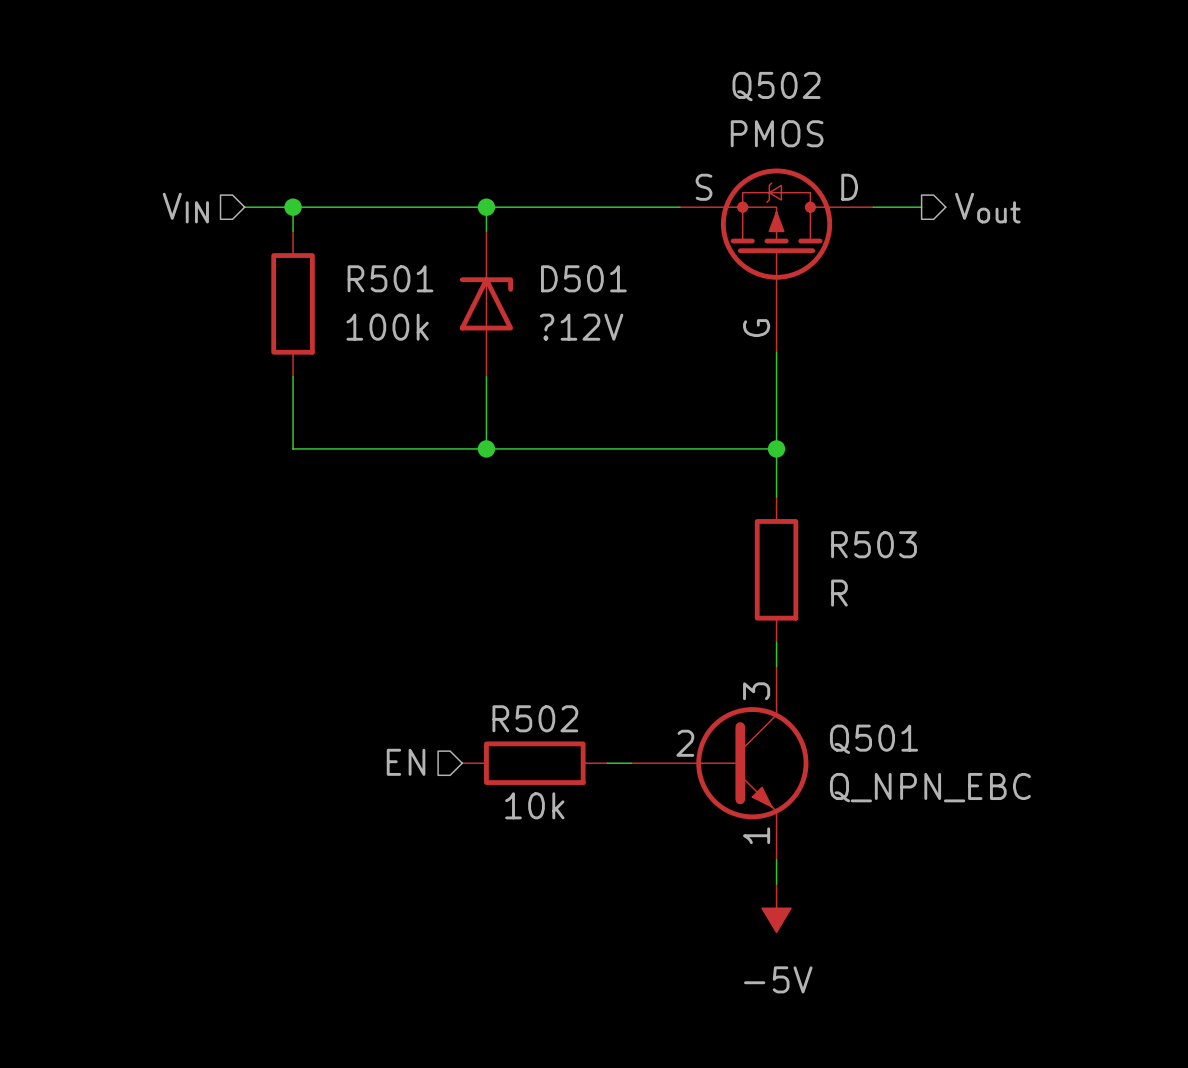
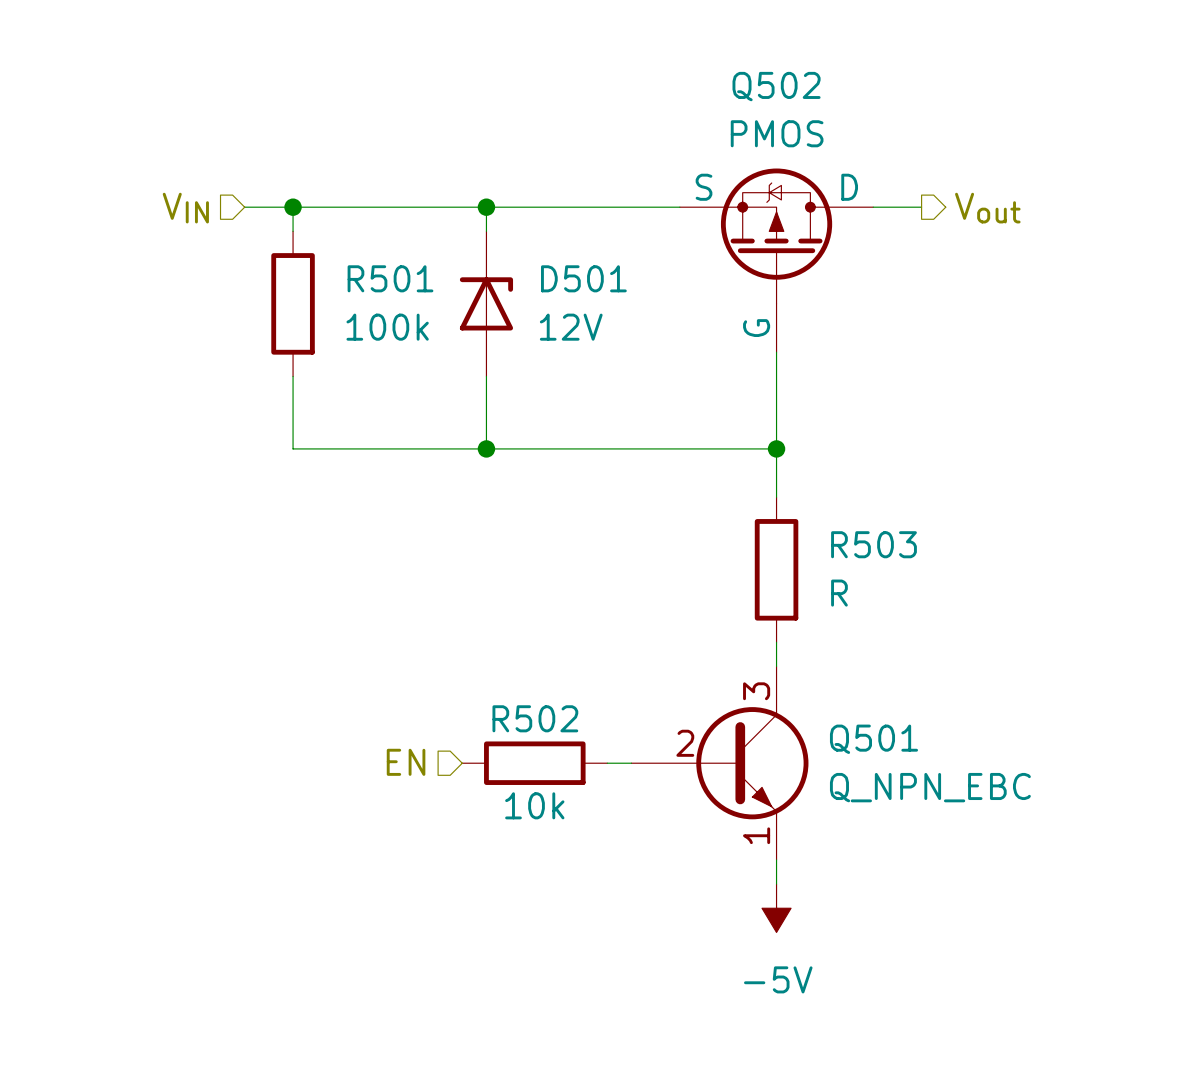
D501 value: ?12V (581, 327) -> 12V (571, 327)

